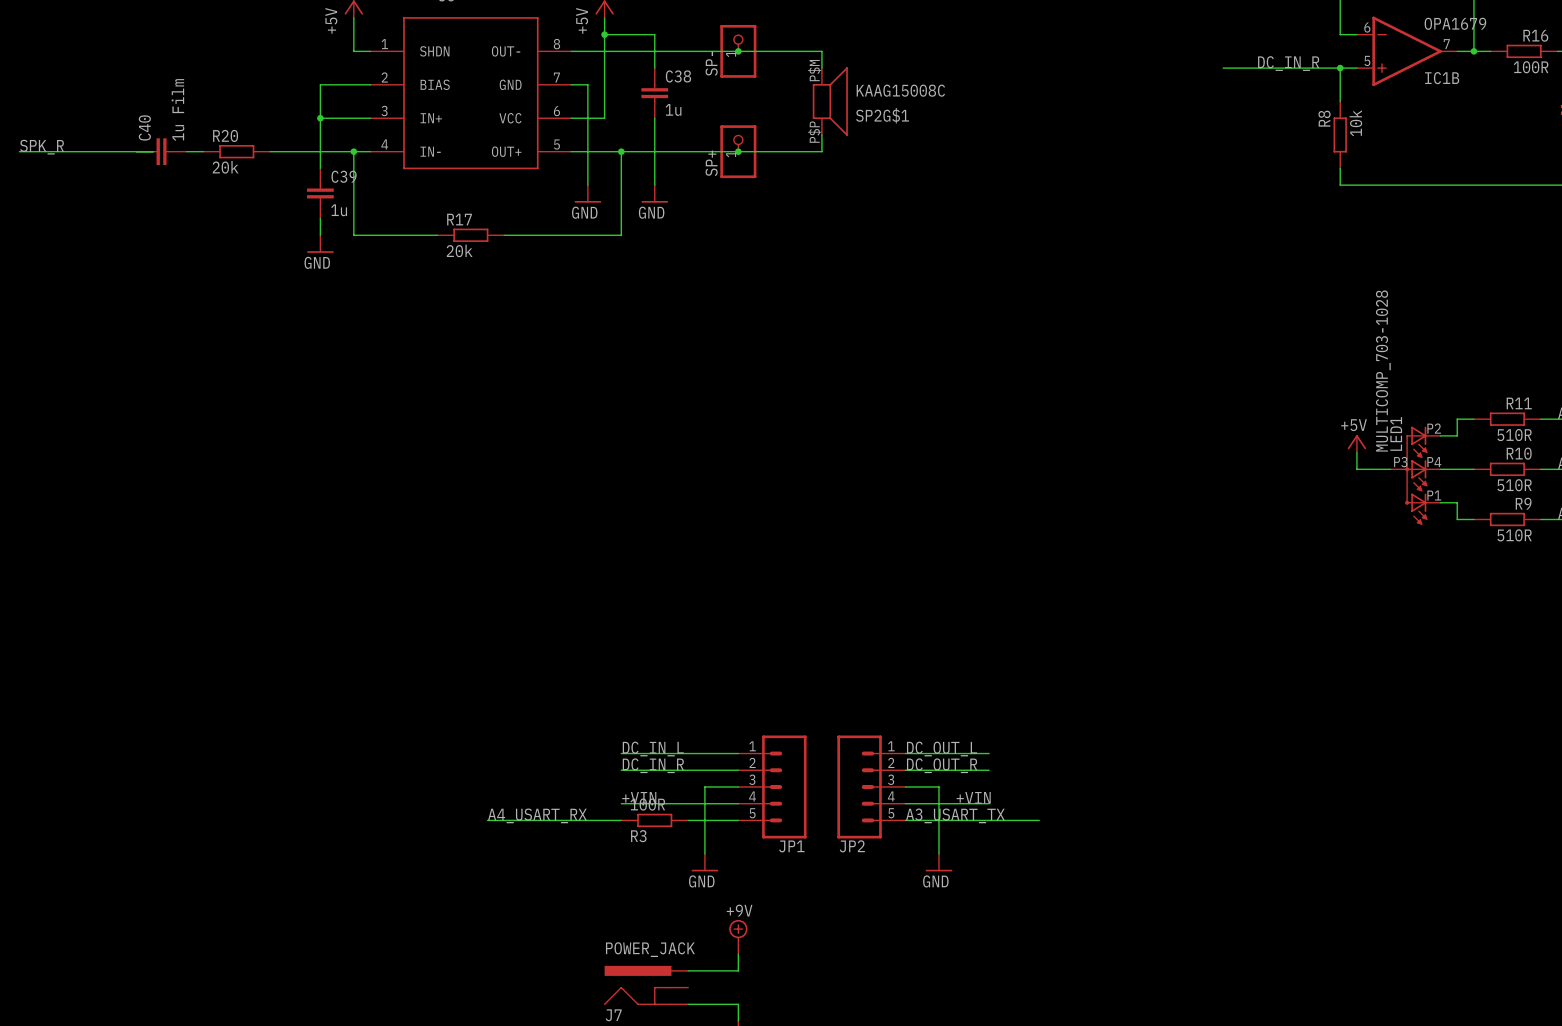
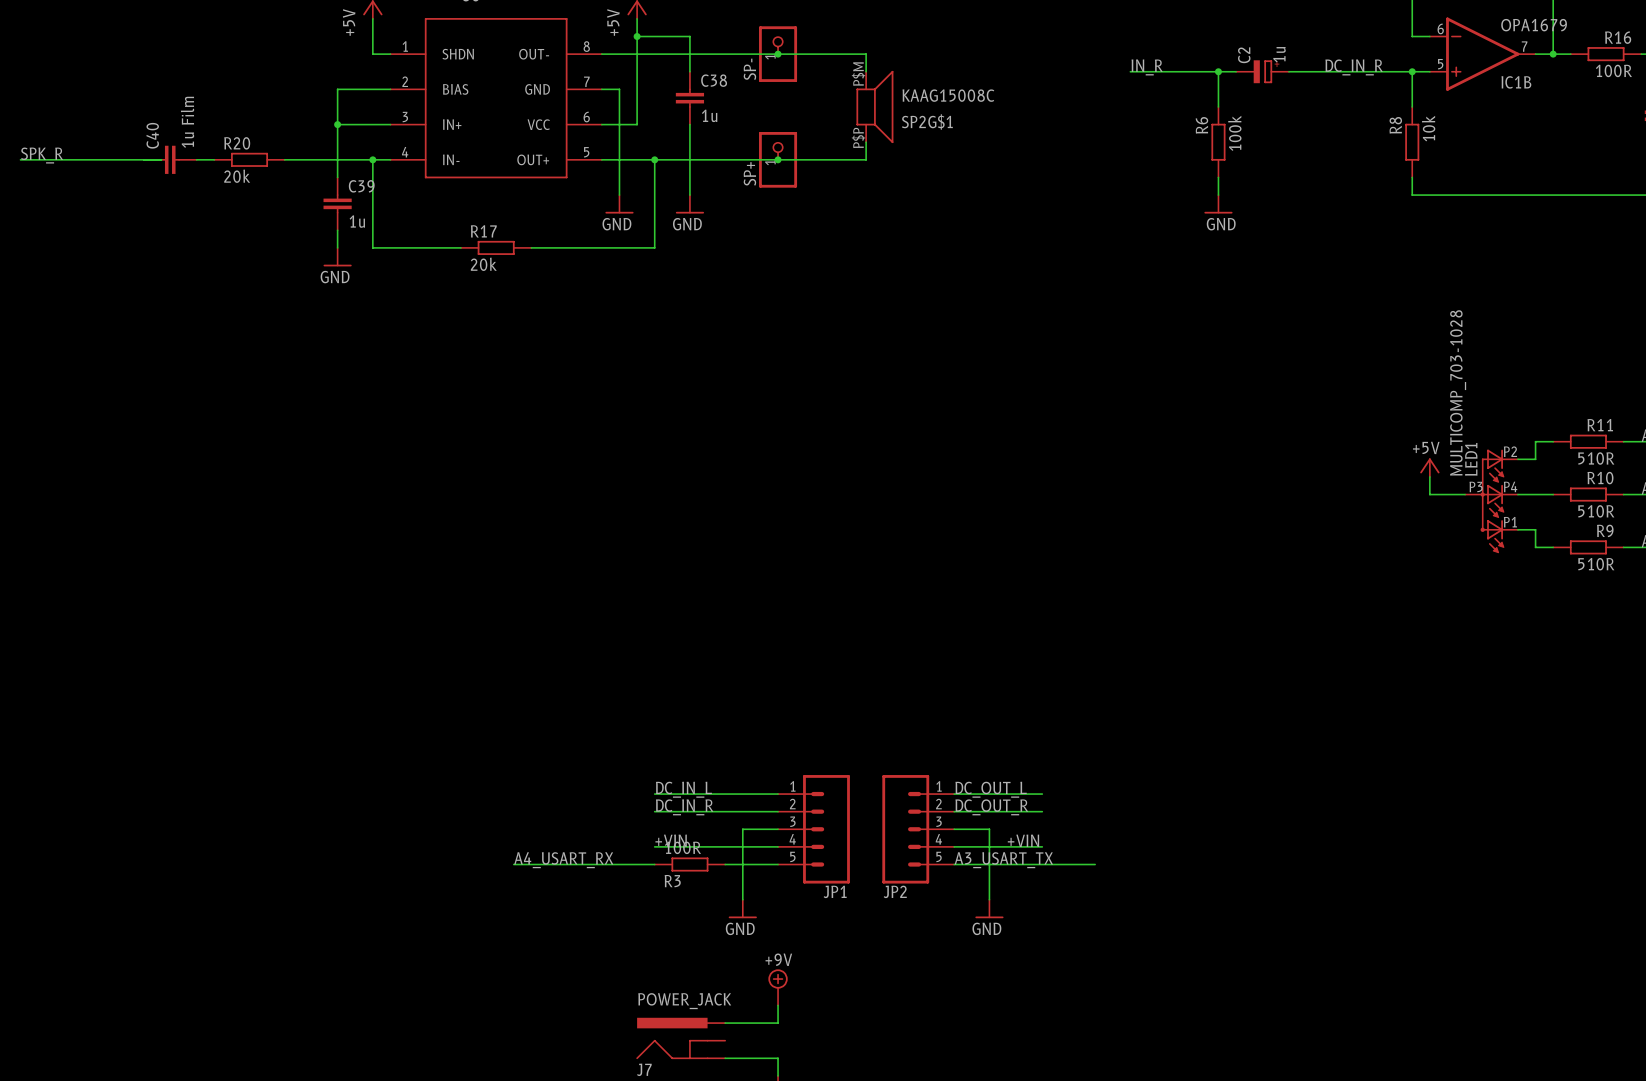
label: none -> IN_R (1147, 67)
wire: none -> (1130, 71) (1236, 71)
wire: none -> (1218, 71) (1218, 106)
junction: none -> (1218, 71)
C2: none -> 1u (1262, 71)
R6: none -> 100k (1218, 142)
wire: none -> (1218, 177) (1218, 195)
power symbol: none -> GND (1218, 204)

